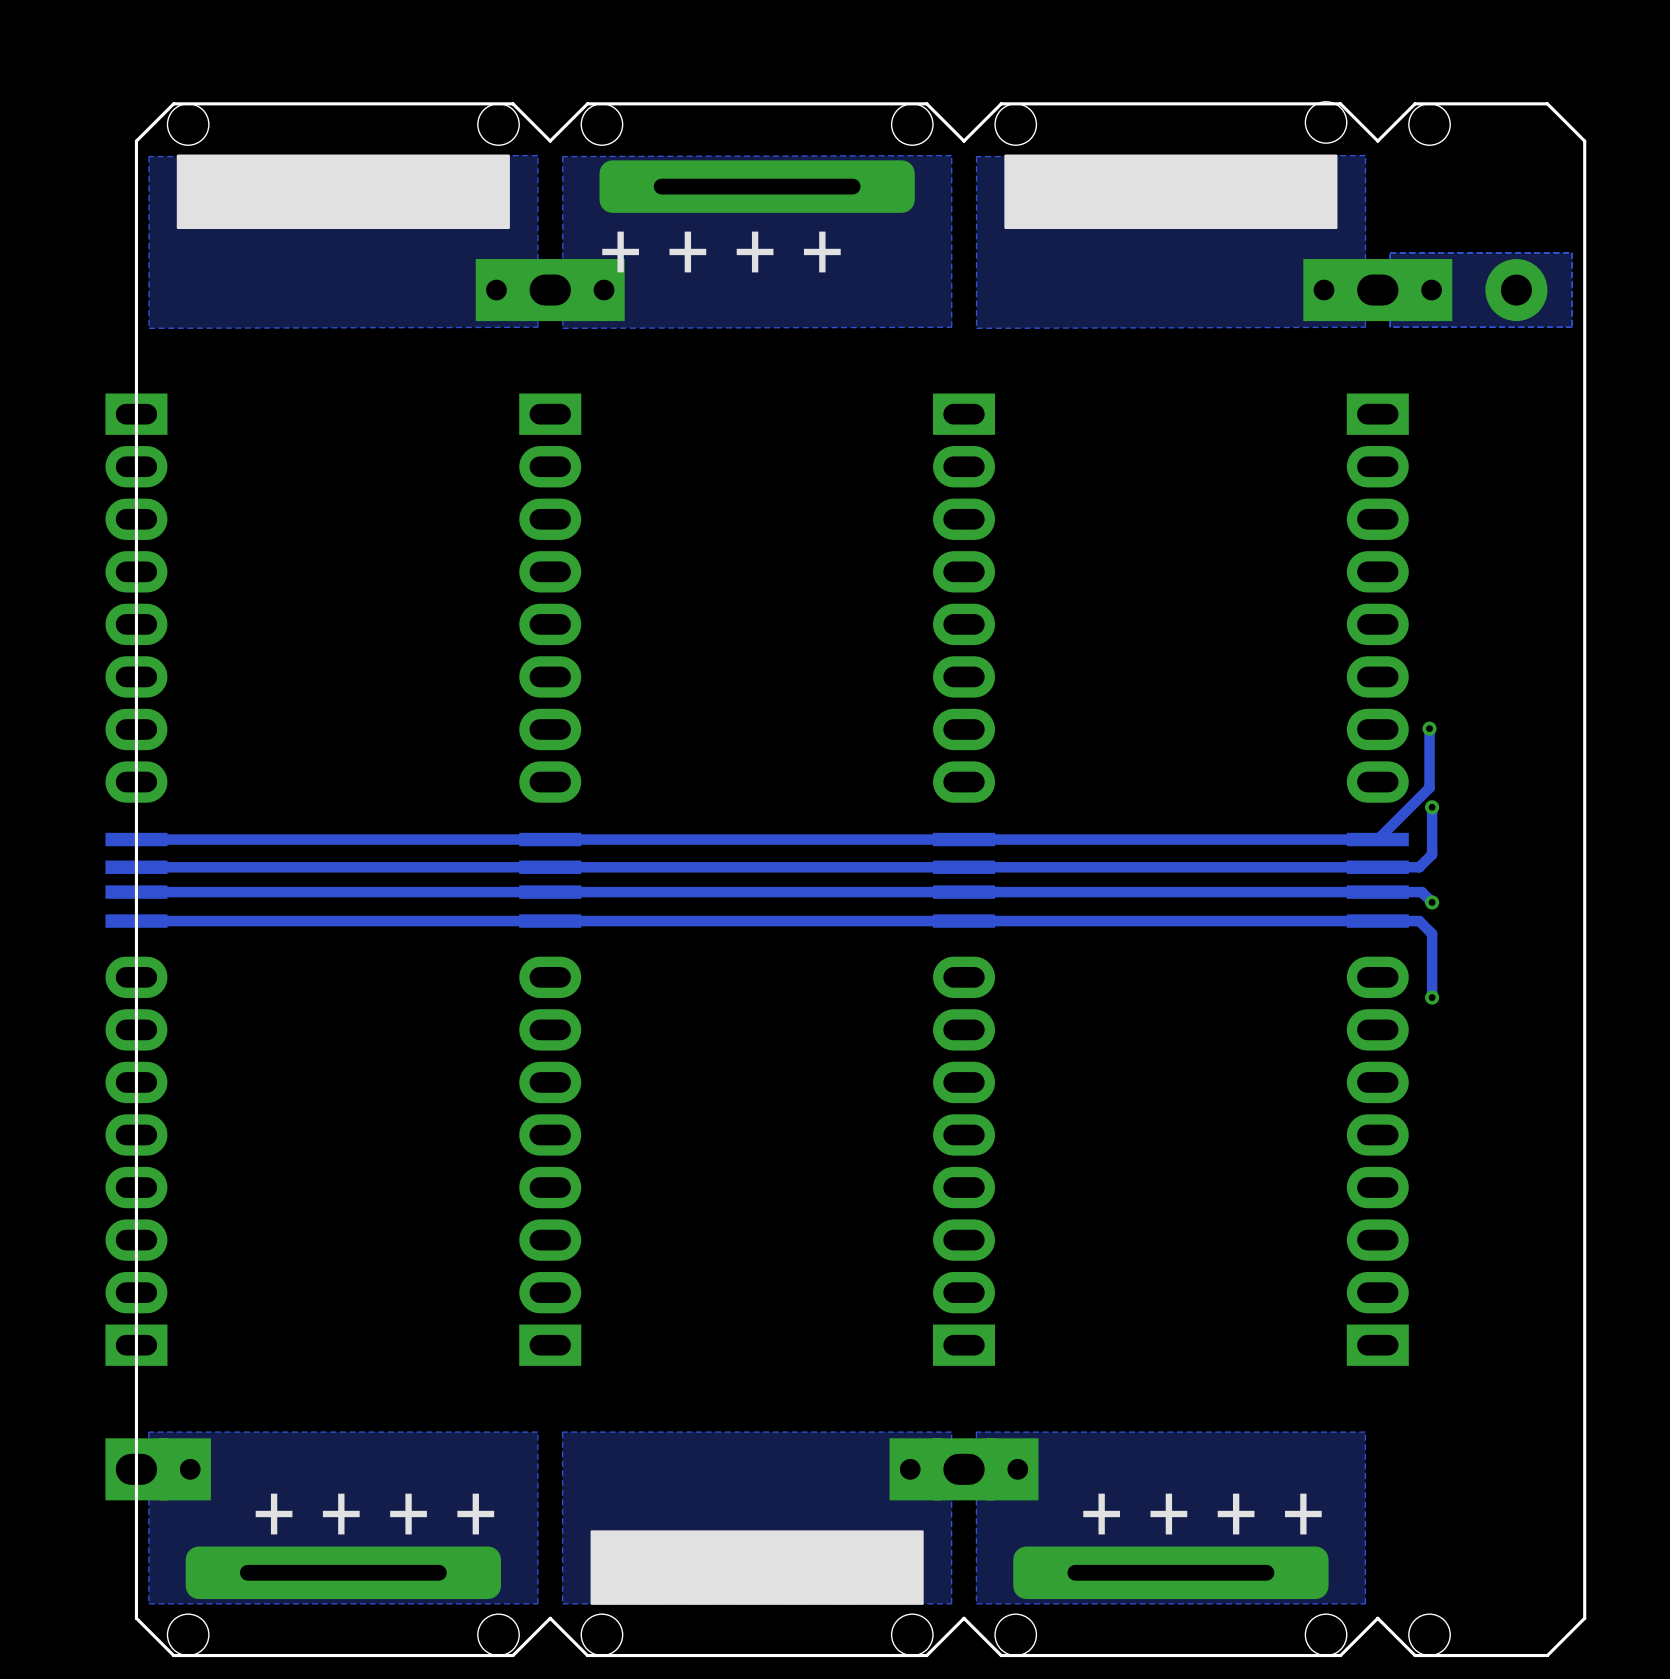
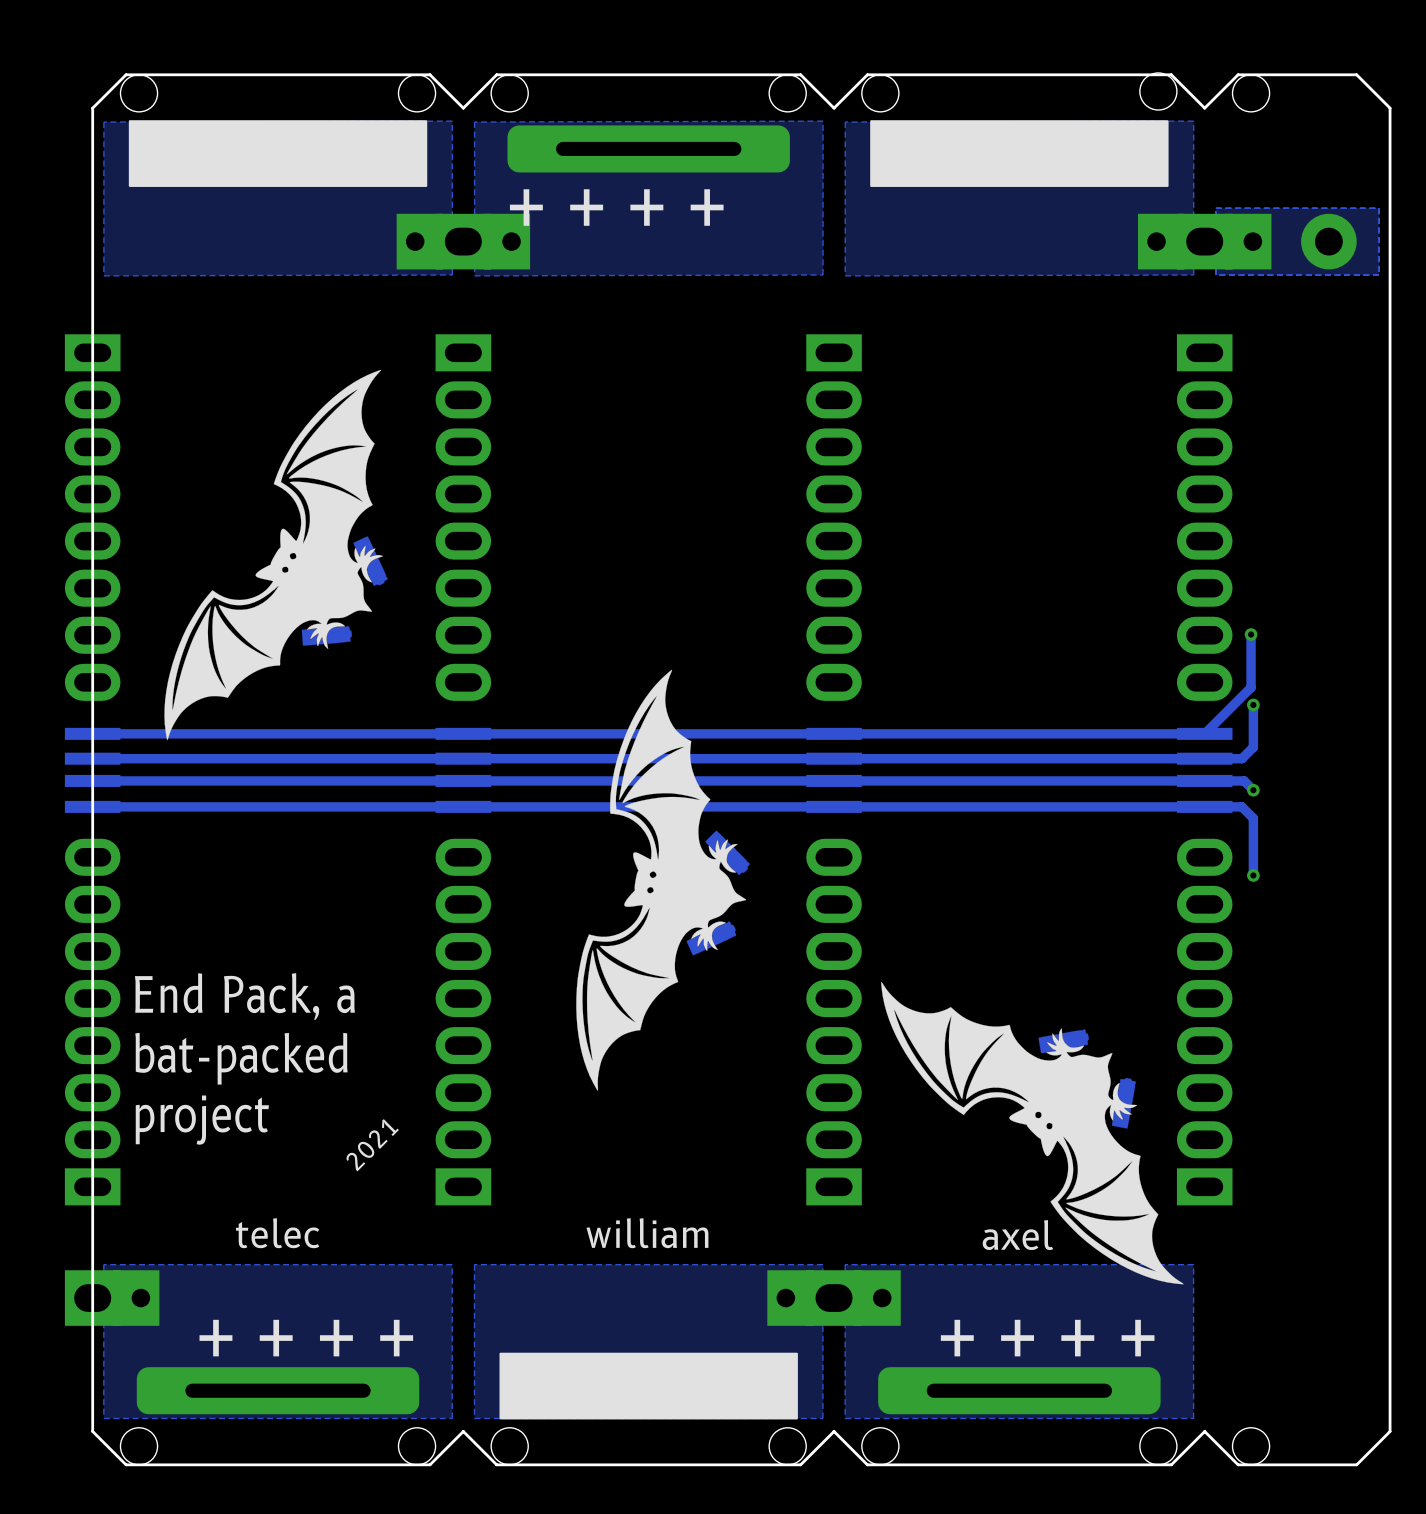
drawing: none -> [164, 369, 388, 741]
drawing: none -> [576, 669, 750, 1091]
drawing: none -> [881, 981, 1184, 1285]
text: none -> End Pack, a (244, 996)
text: none -> bat-packed (241, 1058)
text: none -> project (202, 1120)
text: none -> 2021 (372, 1145)
text: none -> telec (277, 1233)
text: none -> william (647, 1233)
text: none -> axel (1017, 1235)

